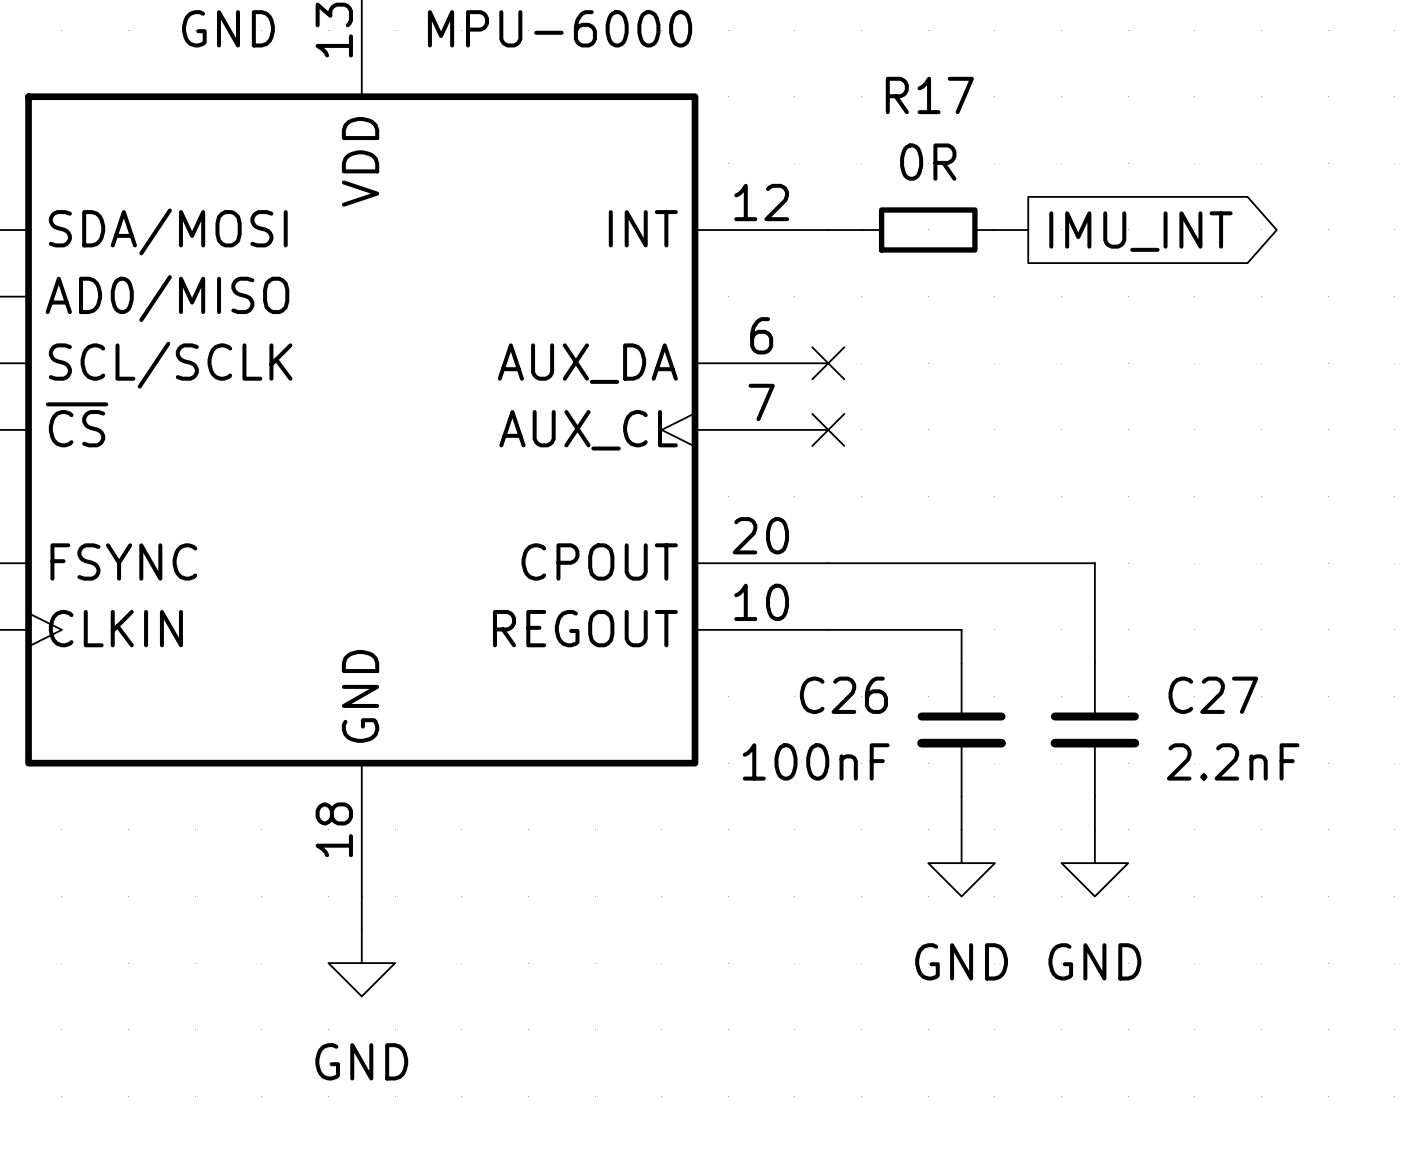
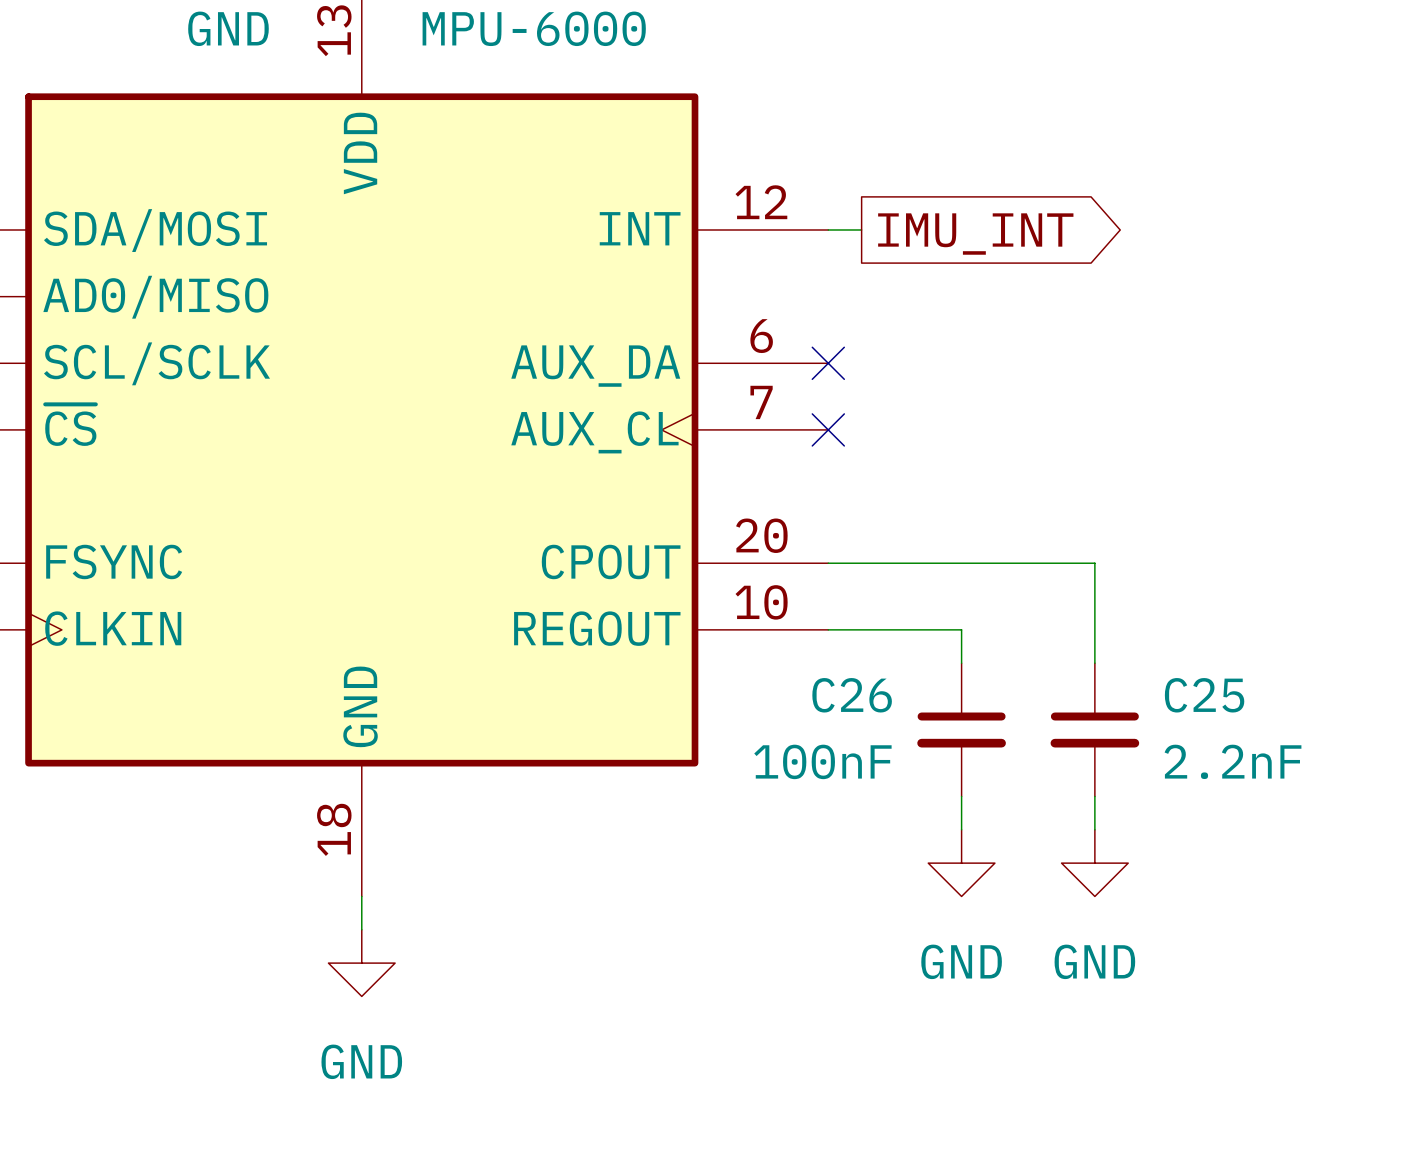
R17: 0R (928, 229) -> none
wire: (994, 229) (1028, 229) -> none
global label position: IMU_INT (1140, 231) -> IMU_INT (975, 234)
C27 name: C27 (1213, 695) -> C25 (1204, 695)

